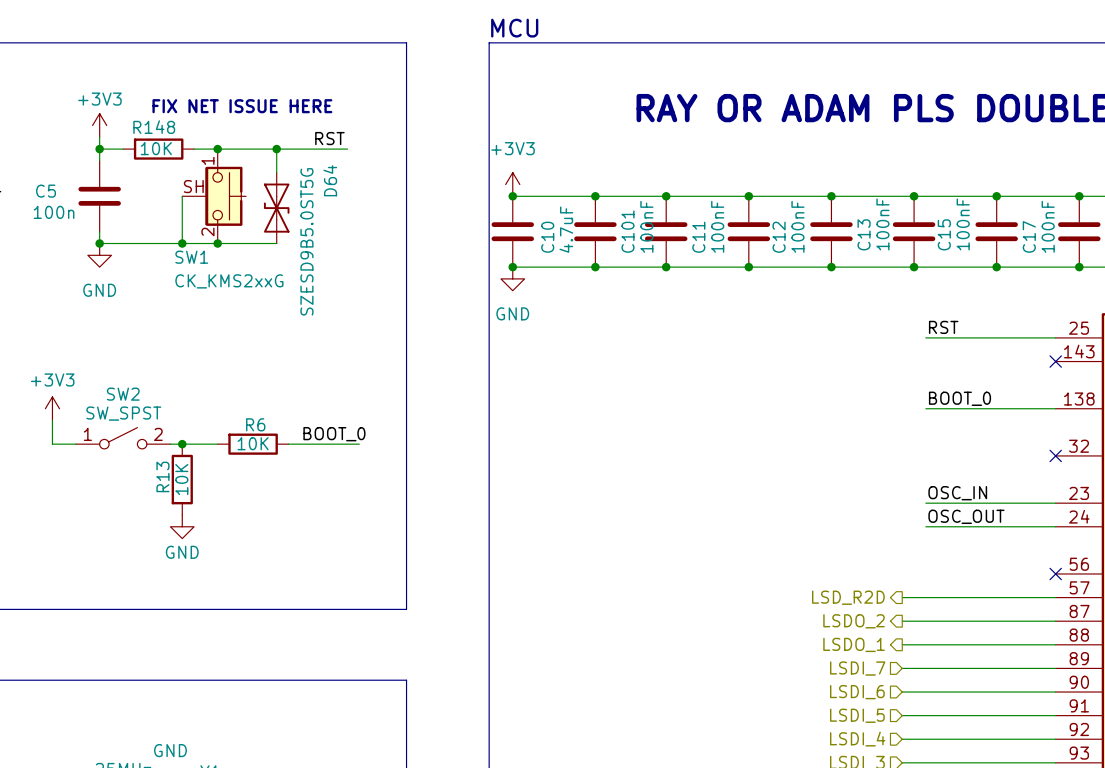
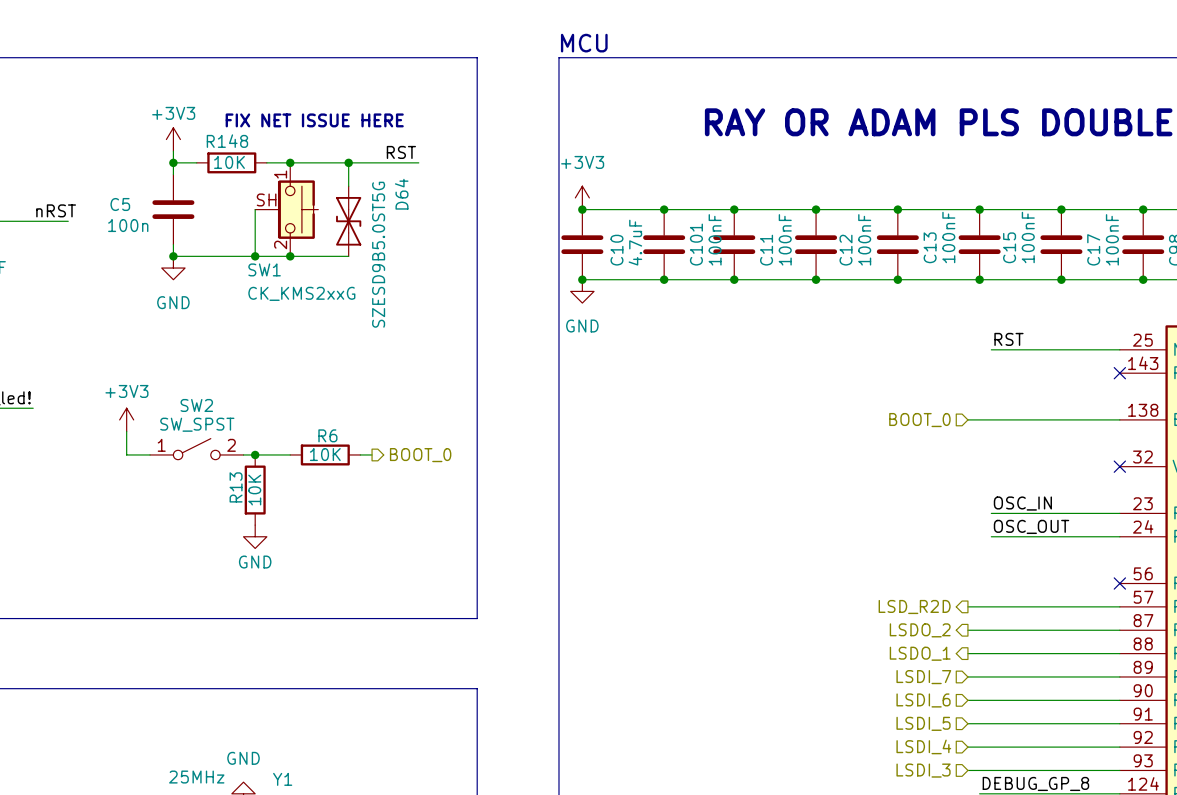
label: BOOT_0 (960, 398) -> none
hierarchical label: none -> BOOT_0 (919, 420)
wire: none -> (967, 419) (991, 419)
label: BOOT_0 (334, 434) -> none
wire: (300, 444) (359, 444) -> none
hierarchical label: none -> BOOT_0 (420, 455)

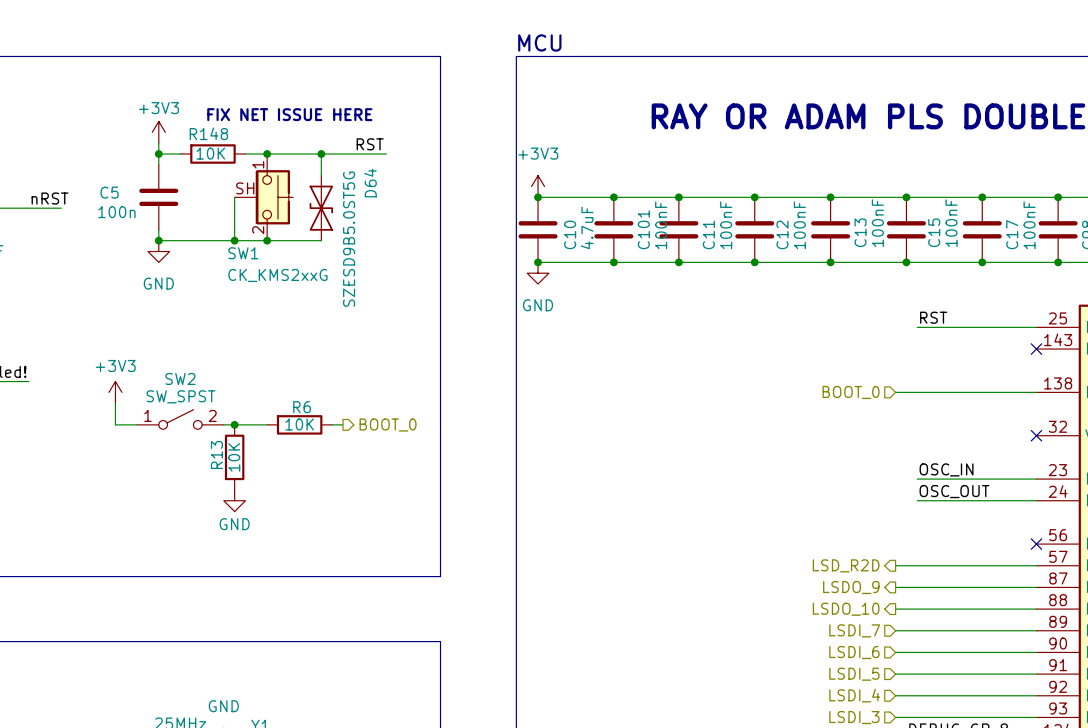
hierarchical label: LSDO_2 (920, 630) -> LSDO_9 (851, 587)
hierarchical label: LSDO_1 (920, 653) -> LSDO_10 (846, 609)

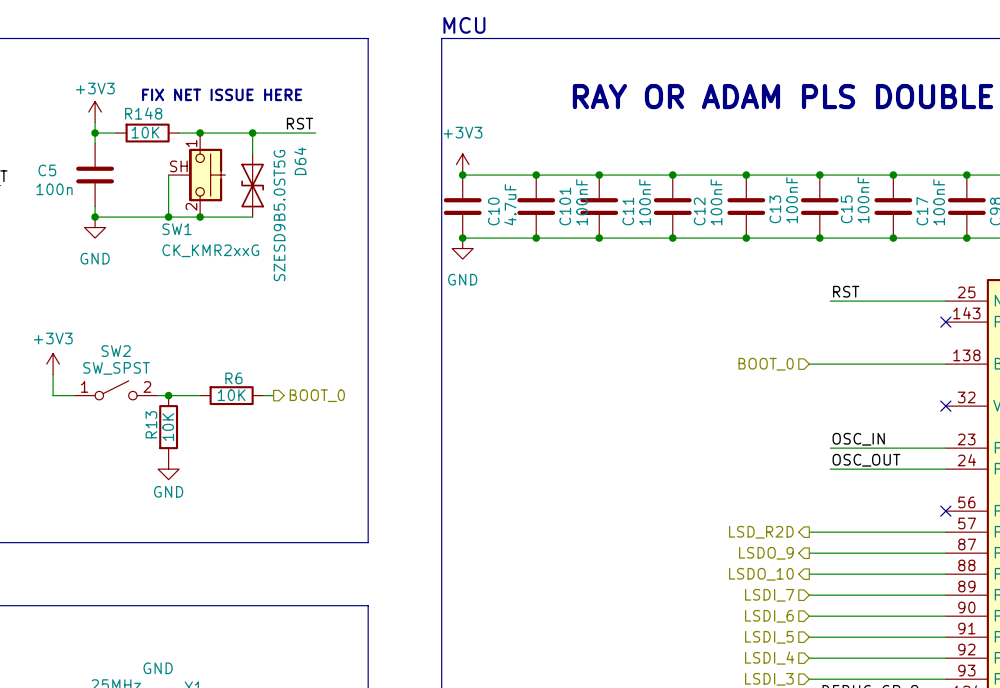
SW1 value: CK_KMS2xxG (277, 275) -> CK_KMR2xxG (210, 250)

